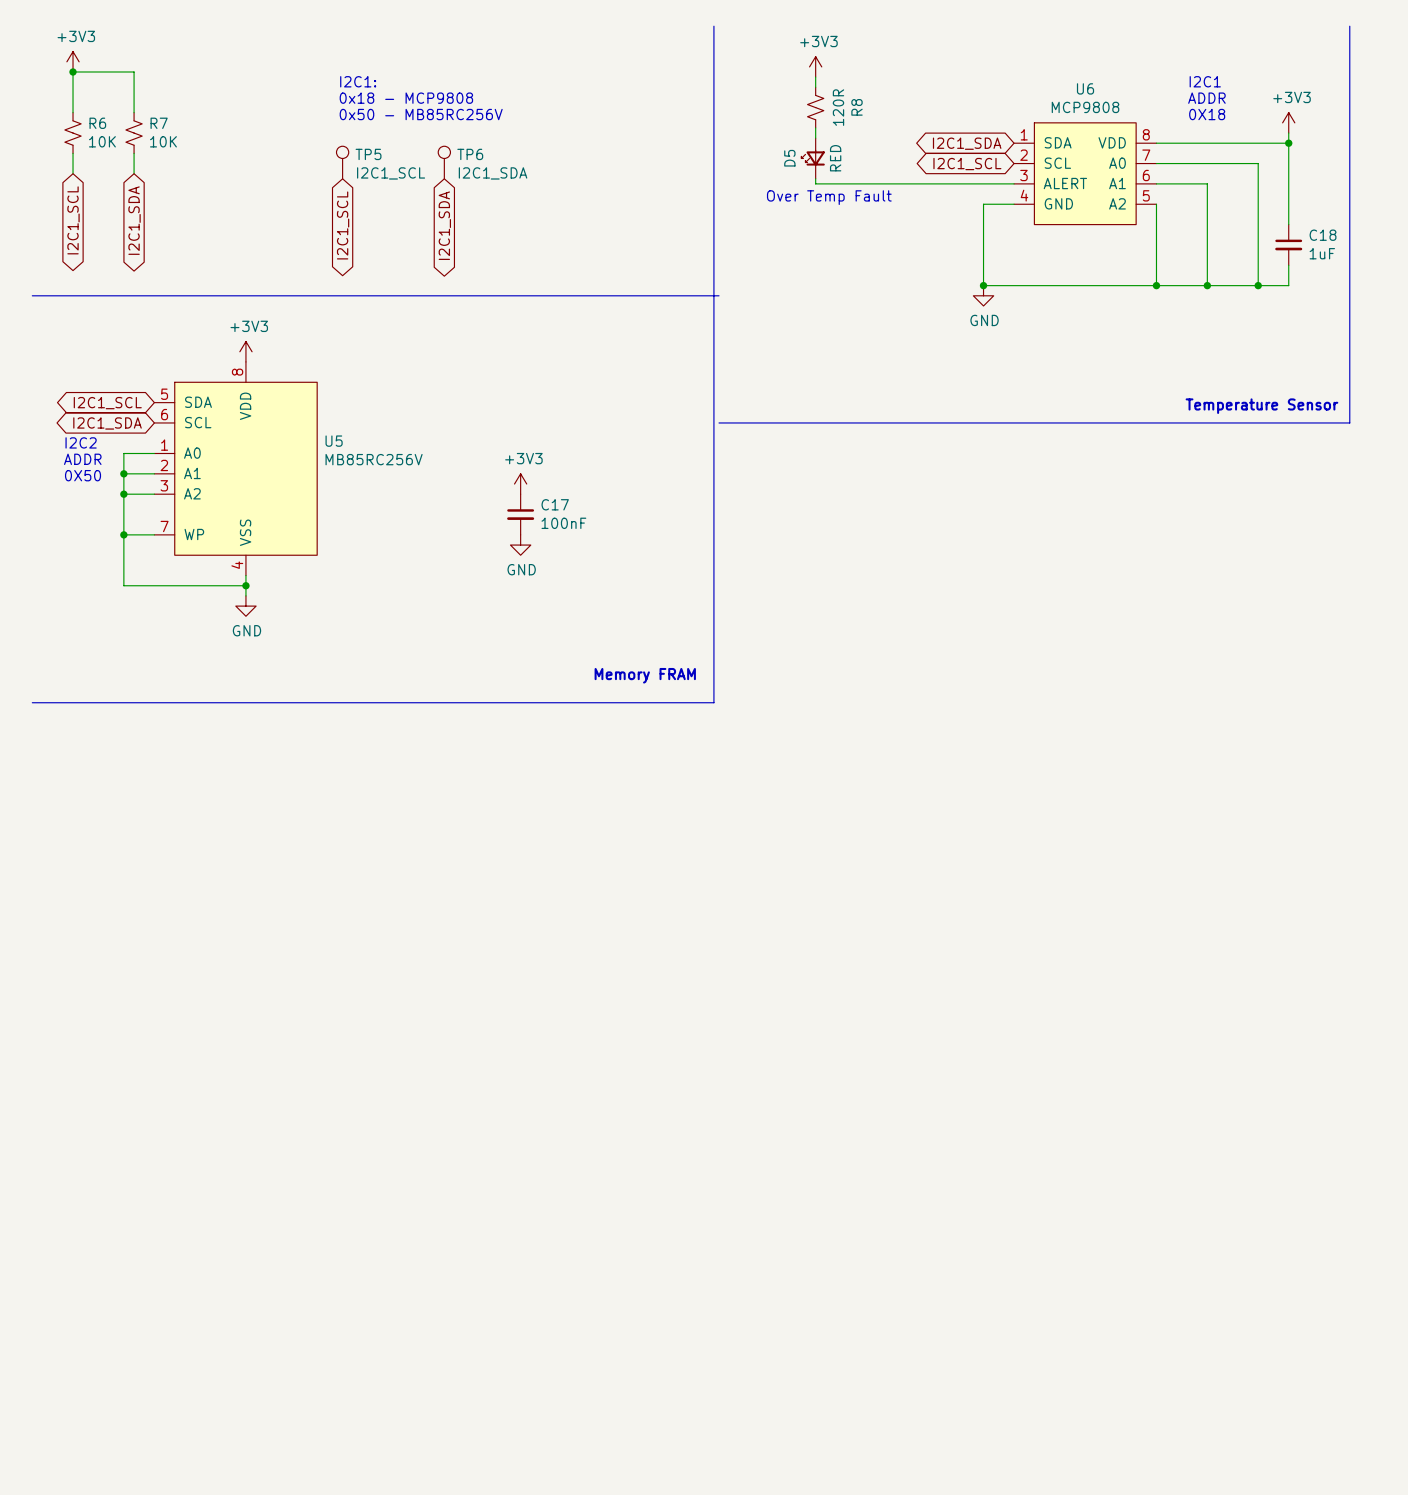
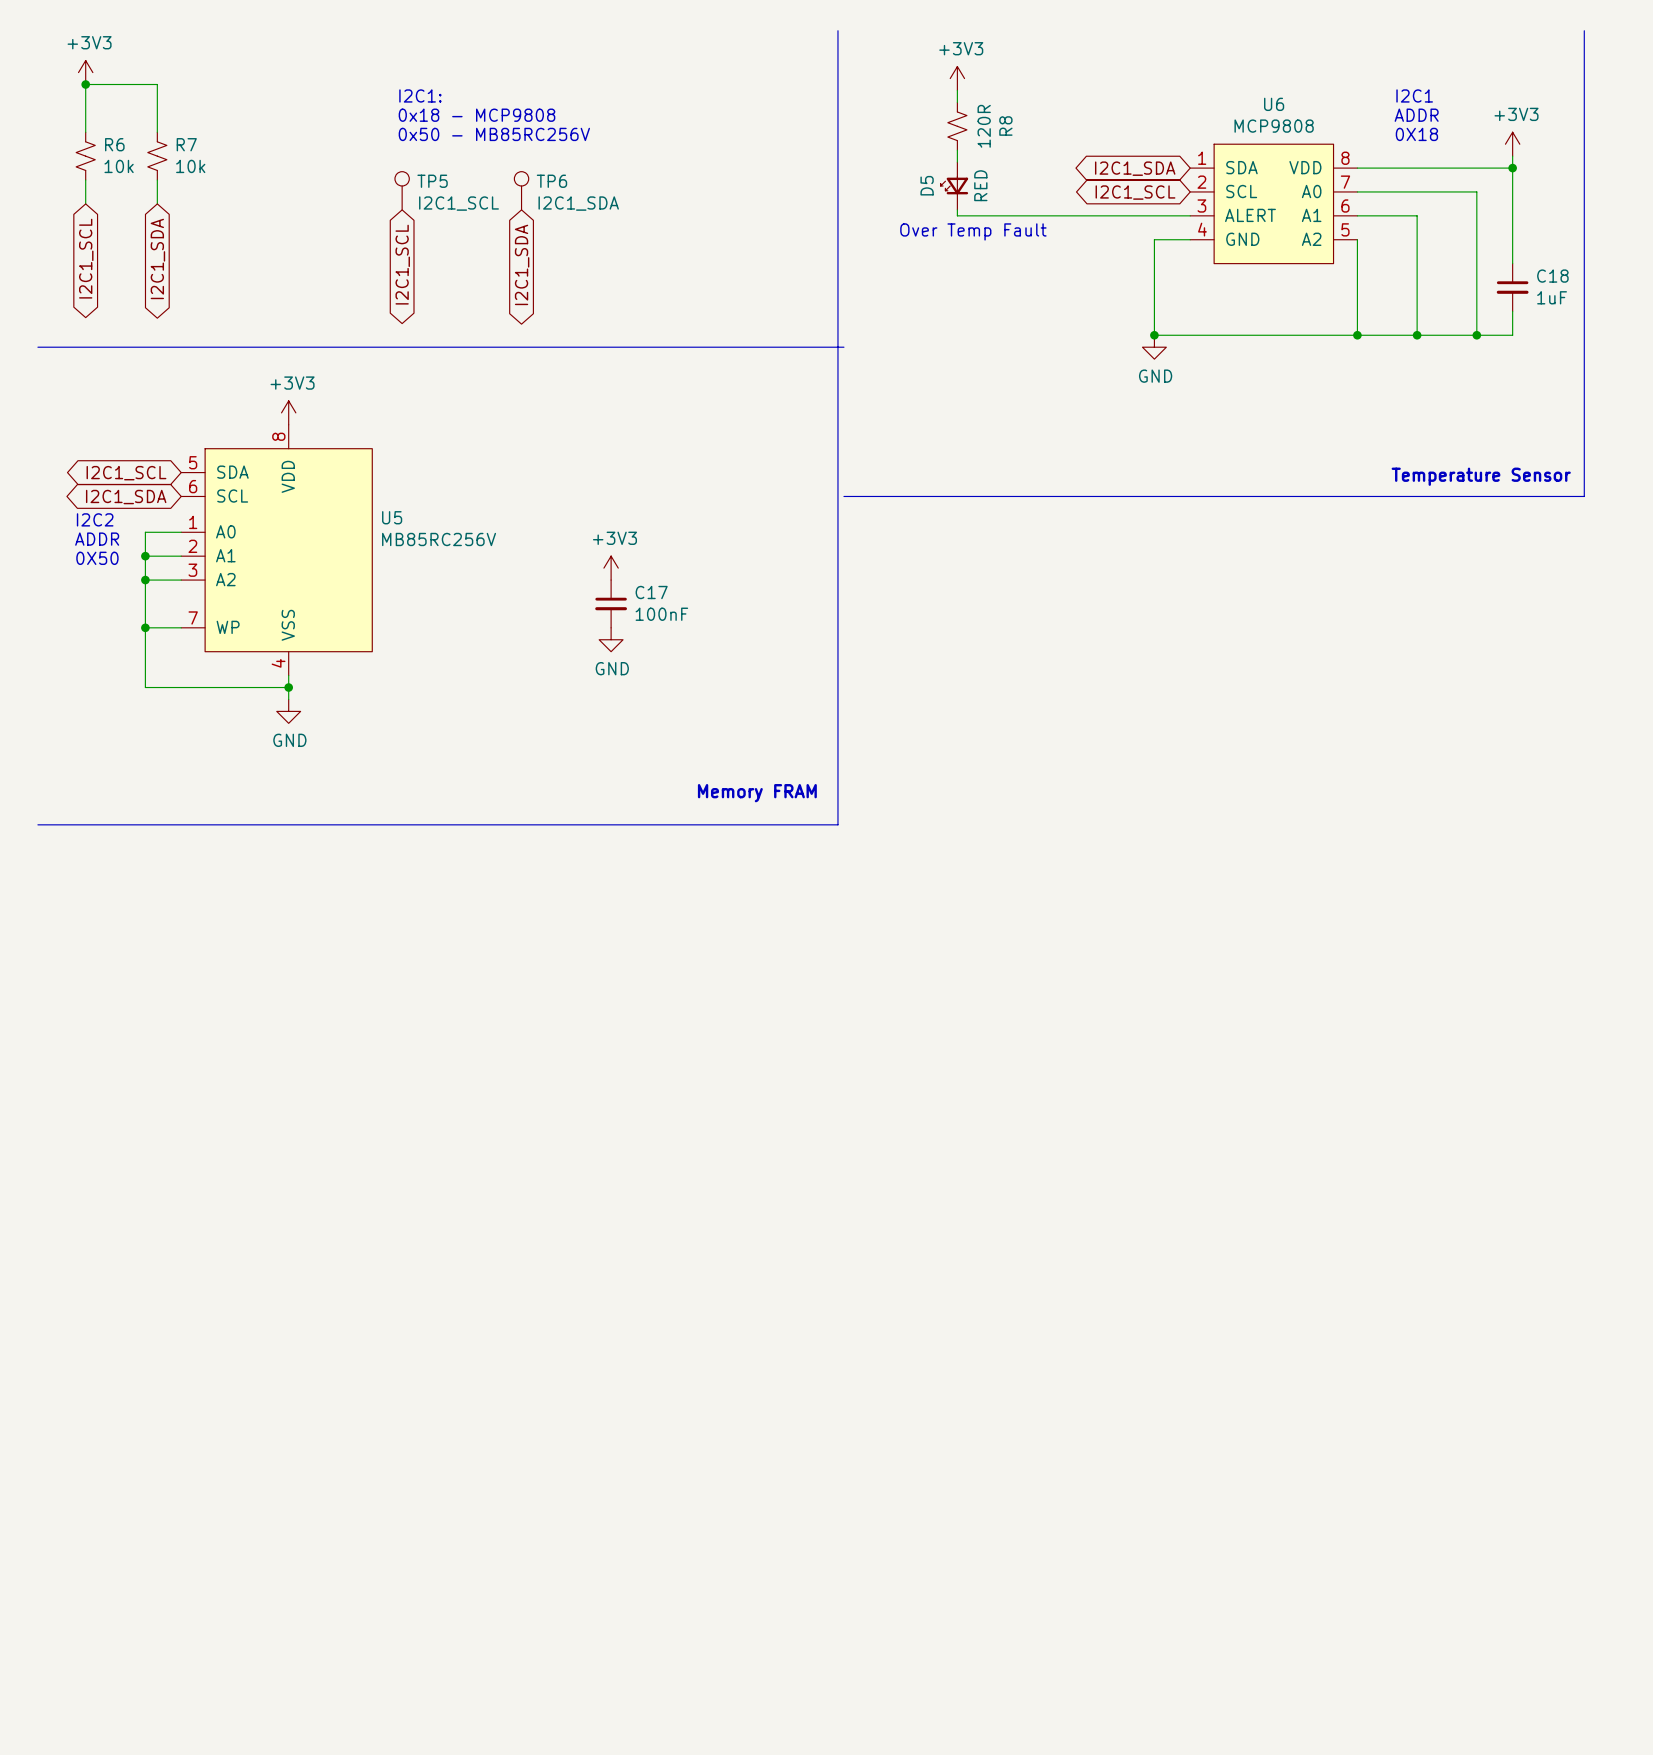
R6 value: 10K (102, 141) -> 10k (119, 166)
R7 value: 10K (163, 141) -> 10k (190, 166)

